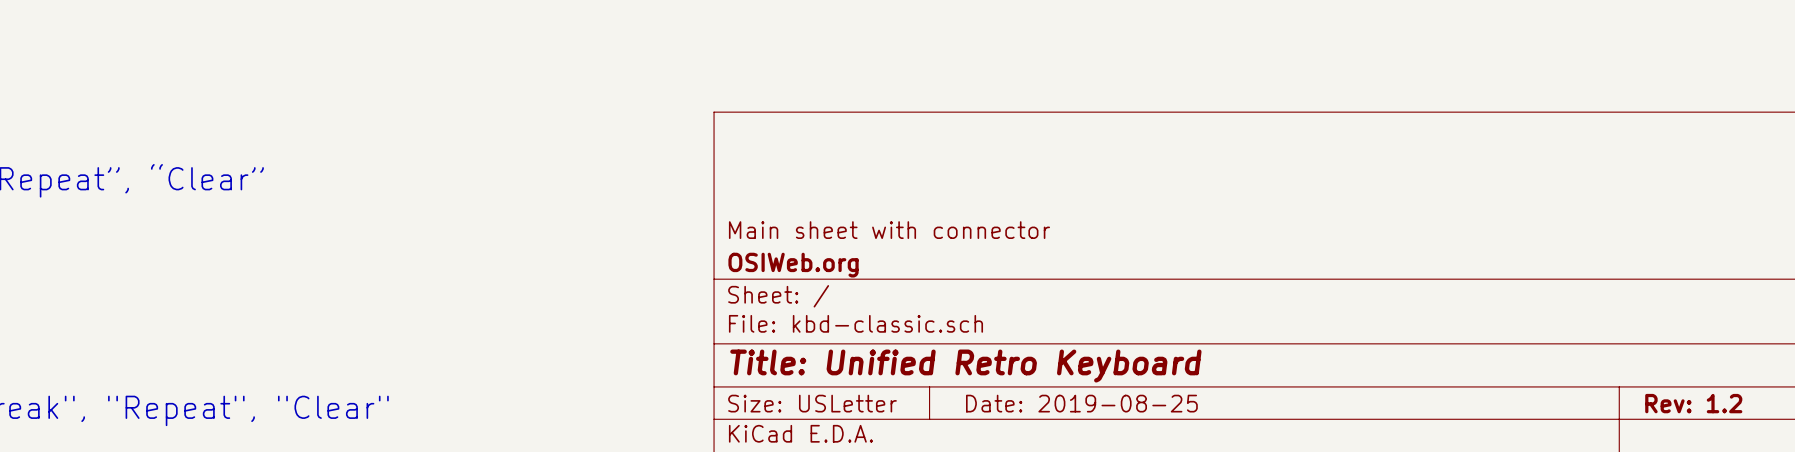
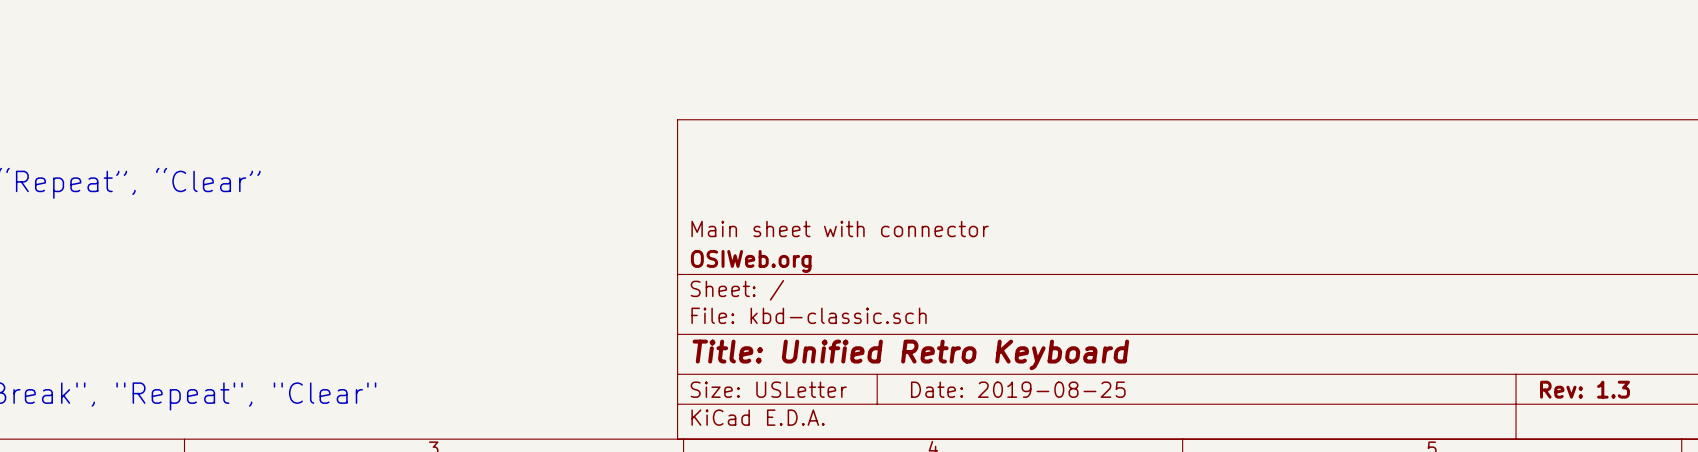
title block: Rev: 1.2 (1693, 403) -> Rev: 1.3 (1585, 389)

